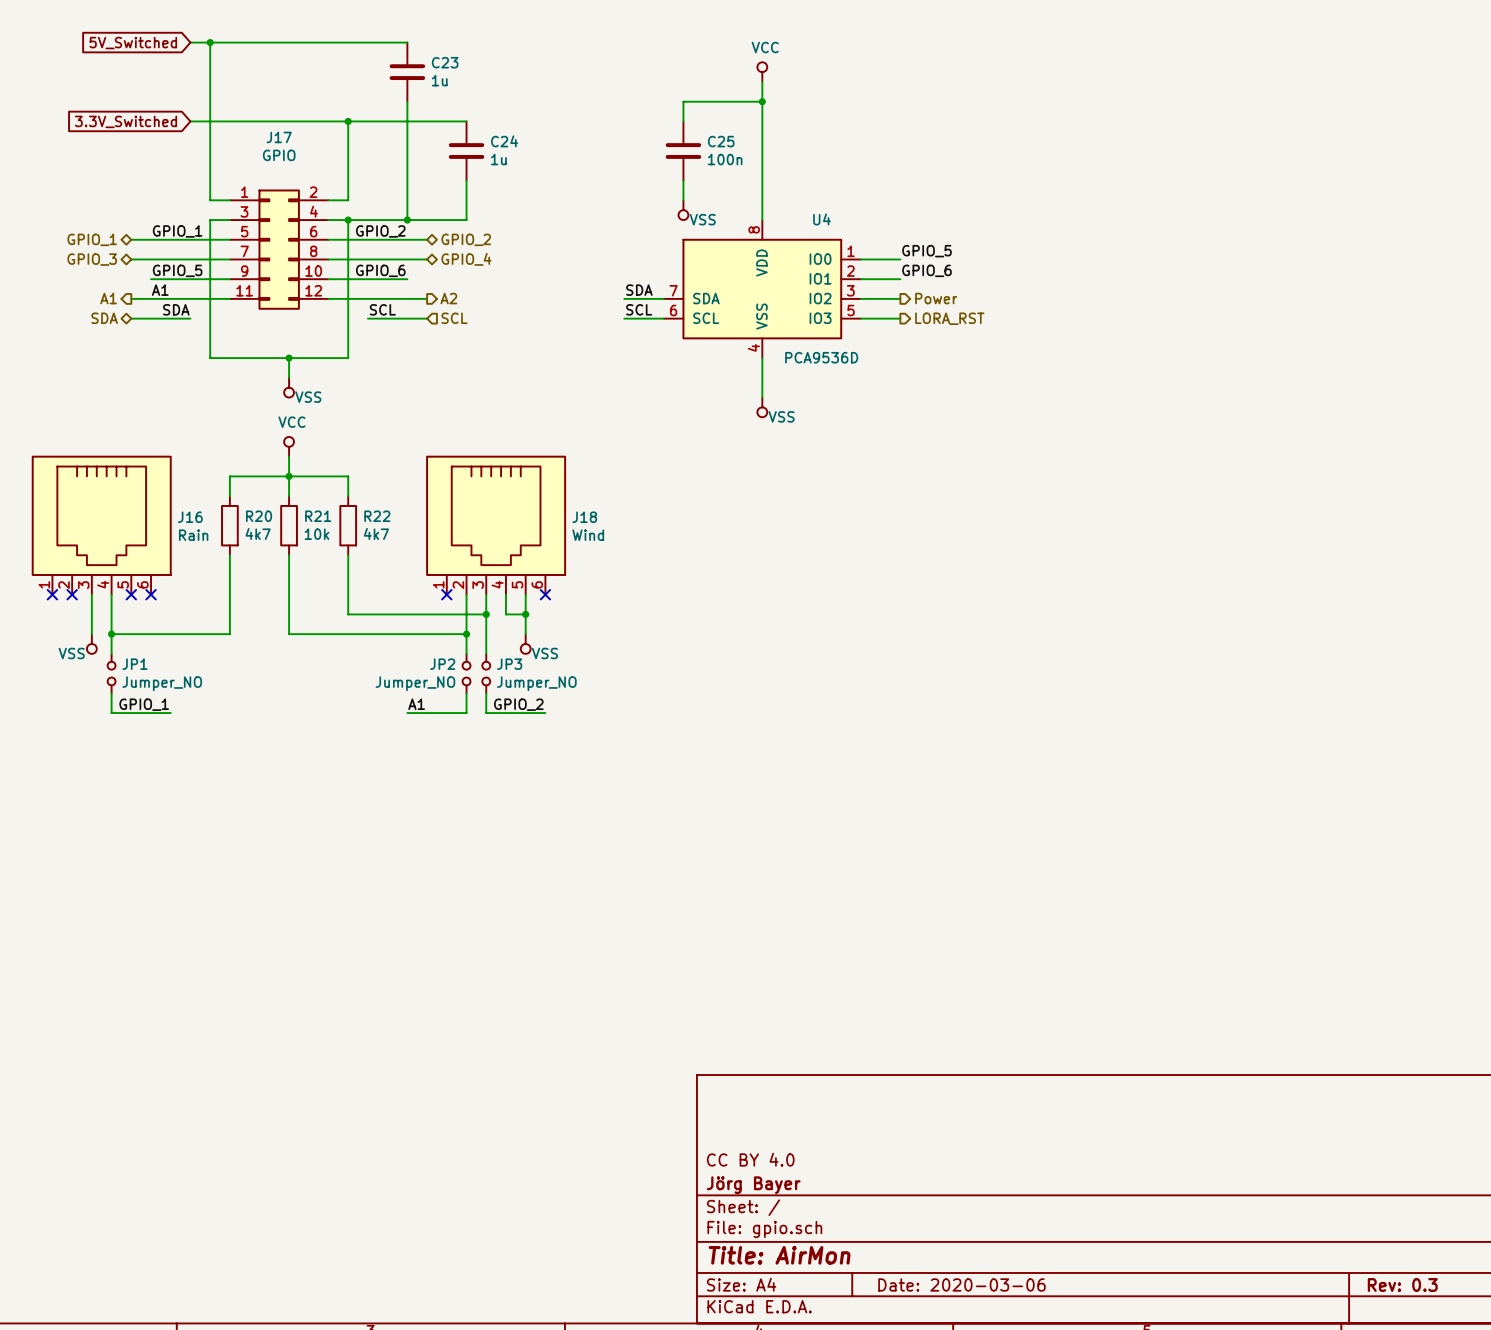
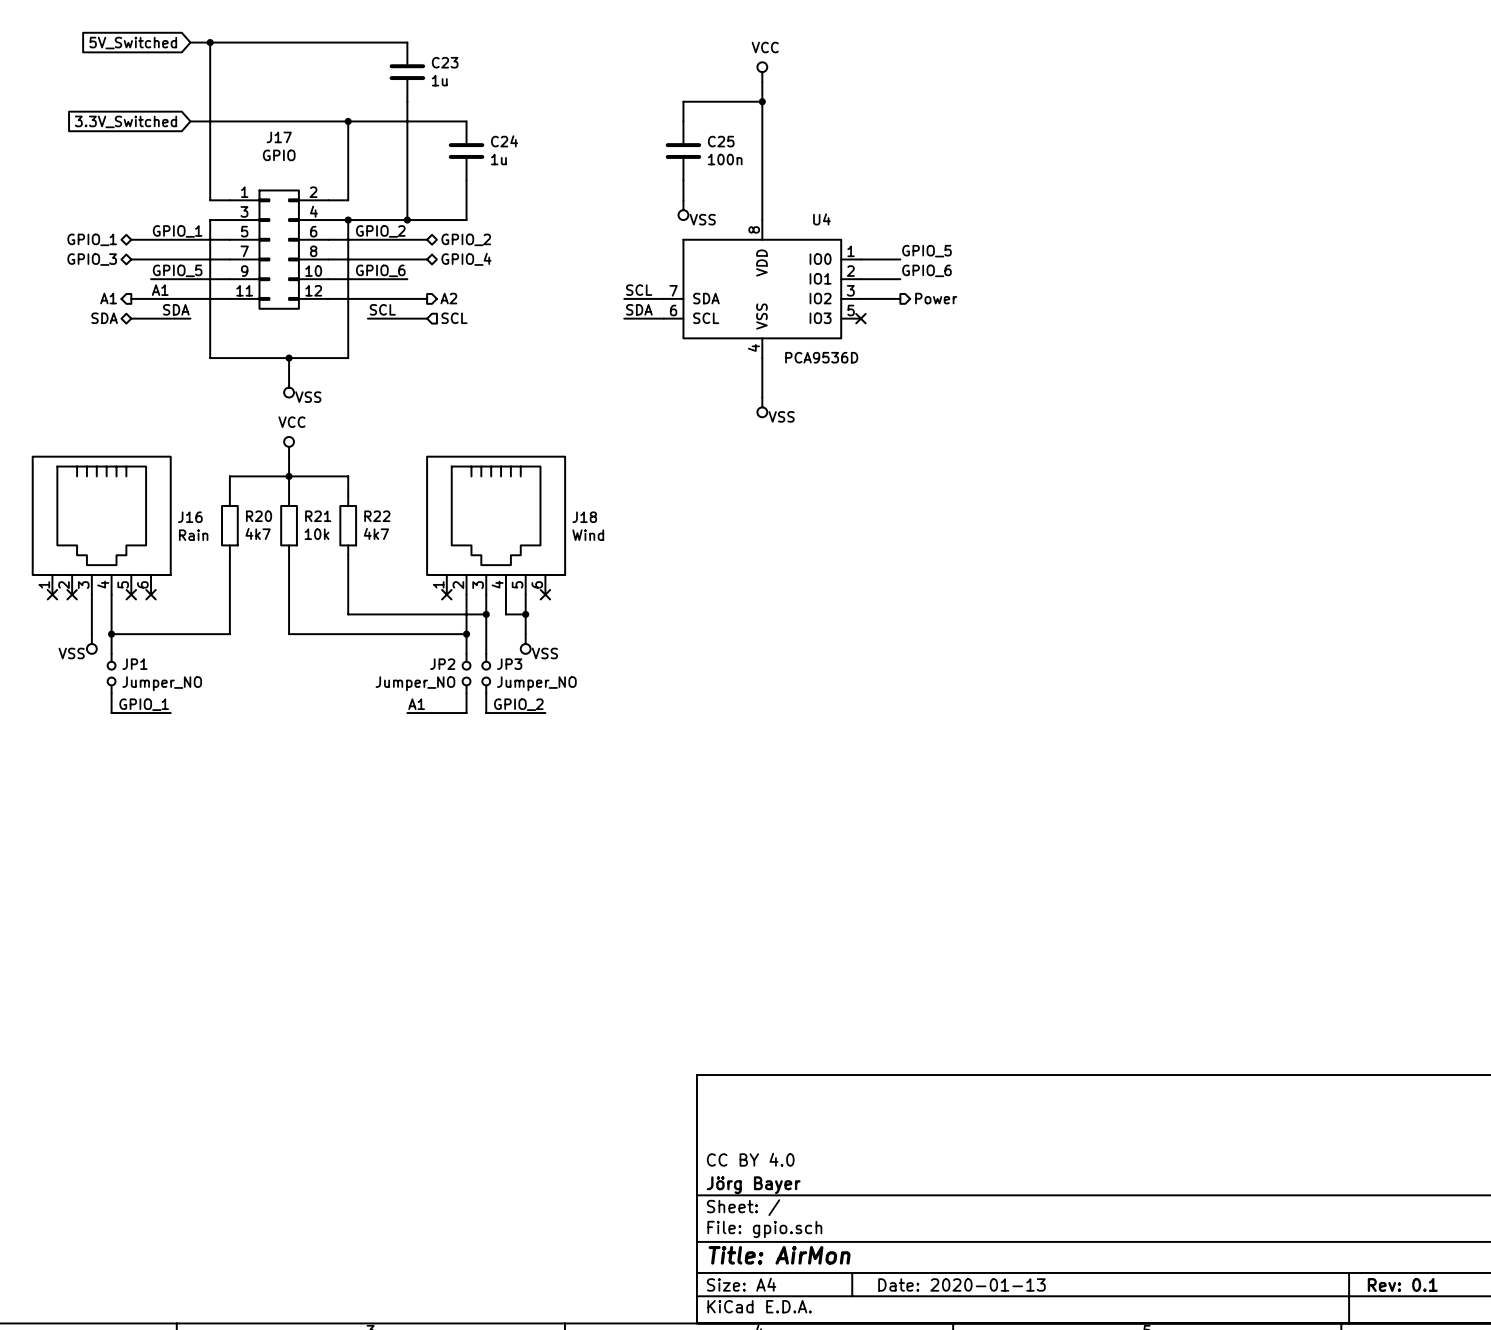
label: SDA (639, 290) -> SCL (639, 290)
label: SCL (639, 309) -> SDA (639, 309)
wire: (860, 318) (900, 318) -> none
no-connect mark: none -> (860, 318)
hierarchical label: LORA_RST (949, 318) -> none
title block: Date: 2020-03-06 (961, 1284) -> Date: 2020-01-13 (961, 1284)
title block: Rev: 0.3 (1402, 1284) -> Rev: 0.1 (1402, 1284)

